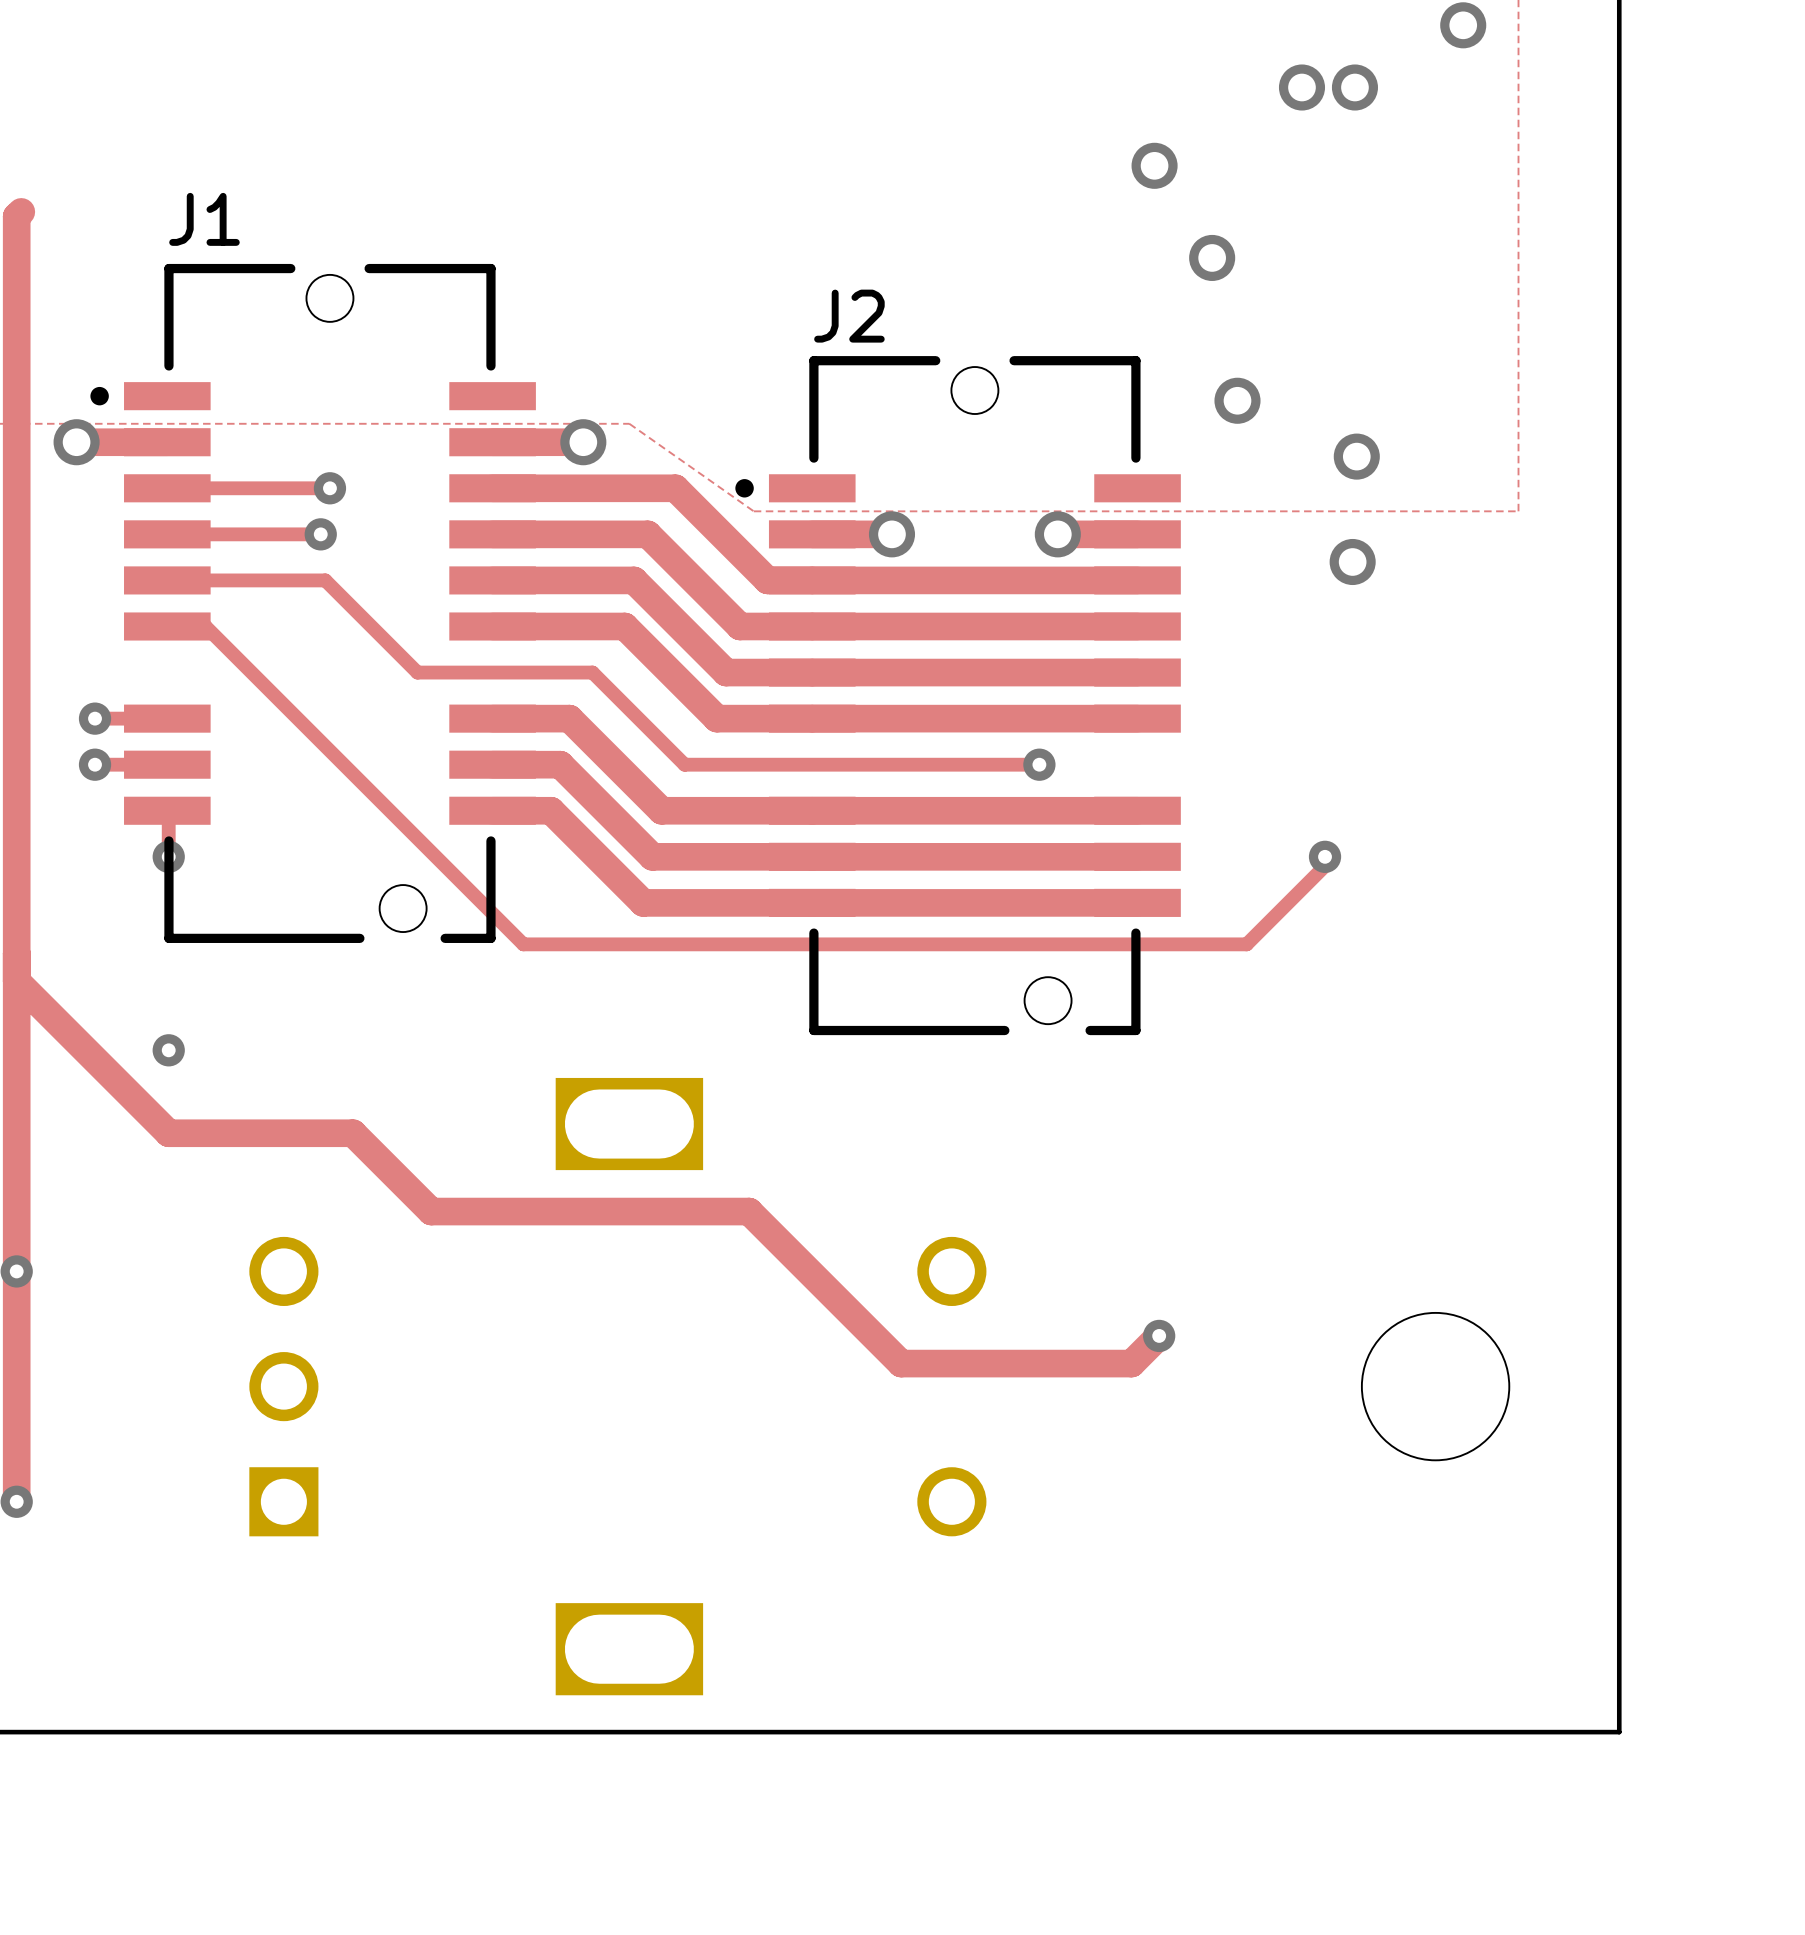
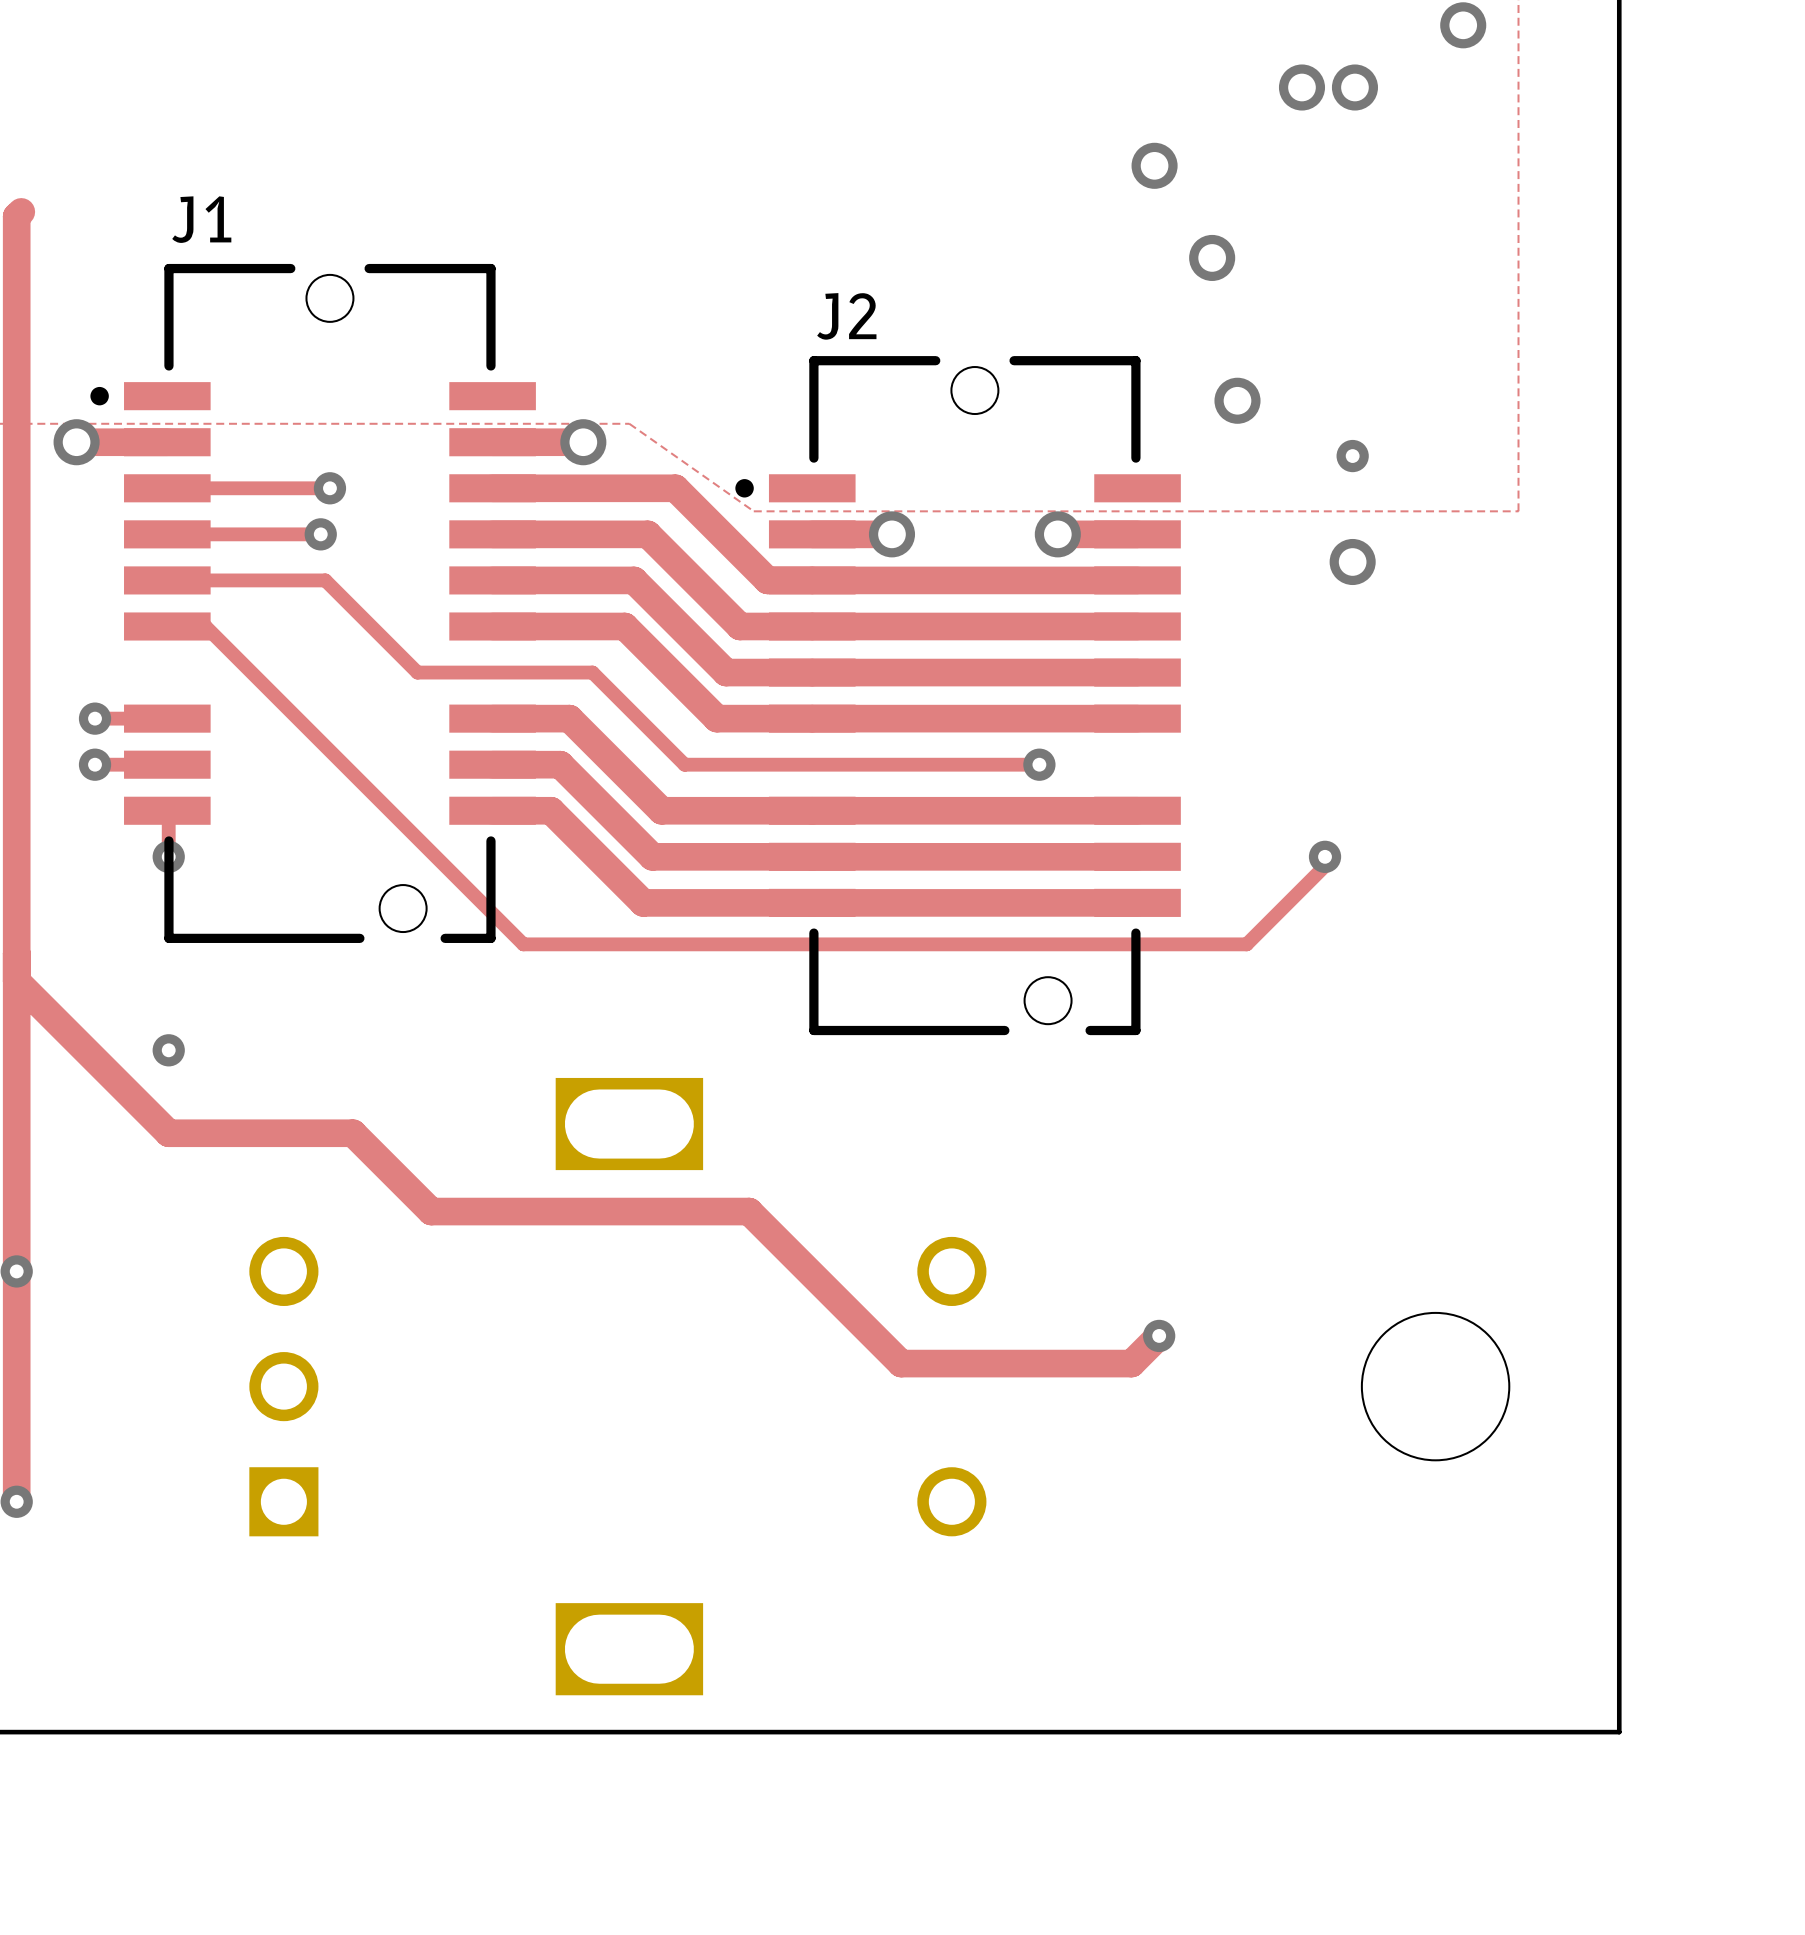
via size: [1333, 433, 1380, 480] -> [1336, 439, 1369, 473]

